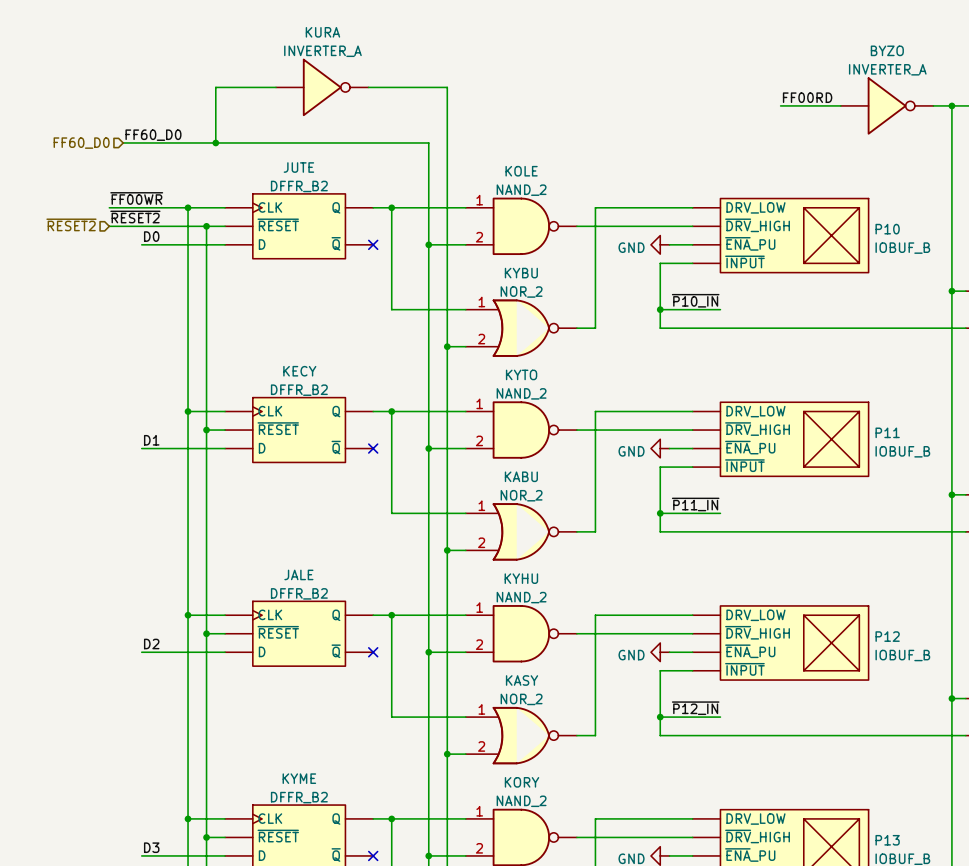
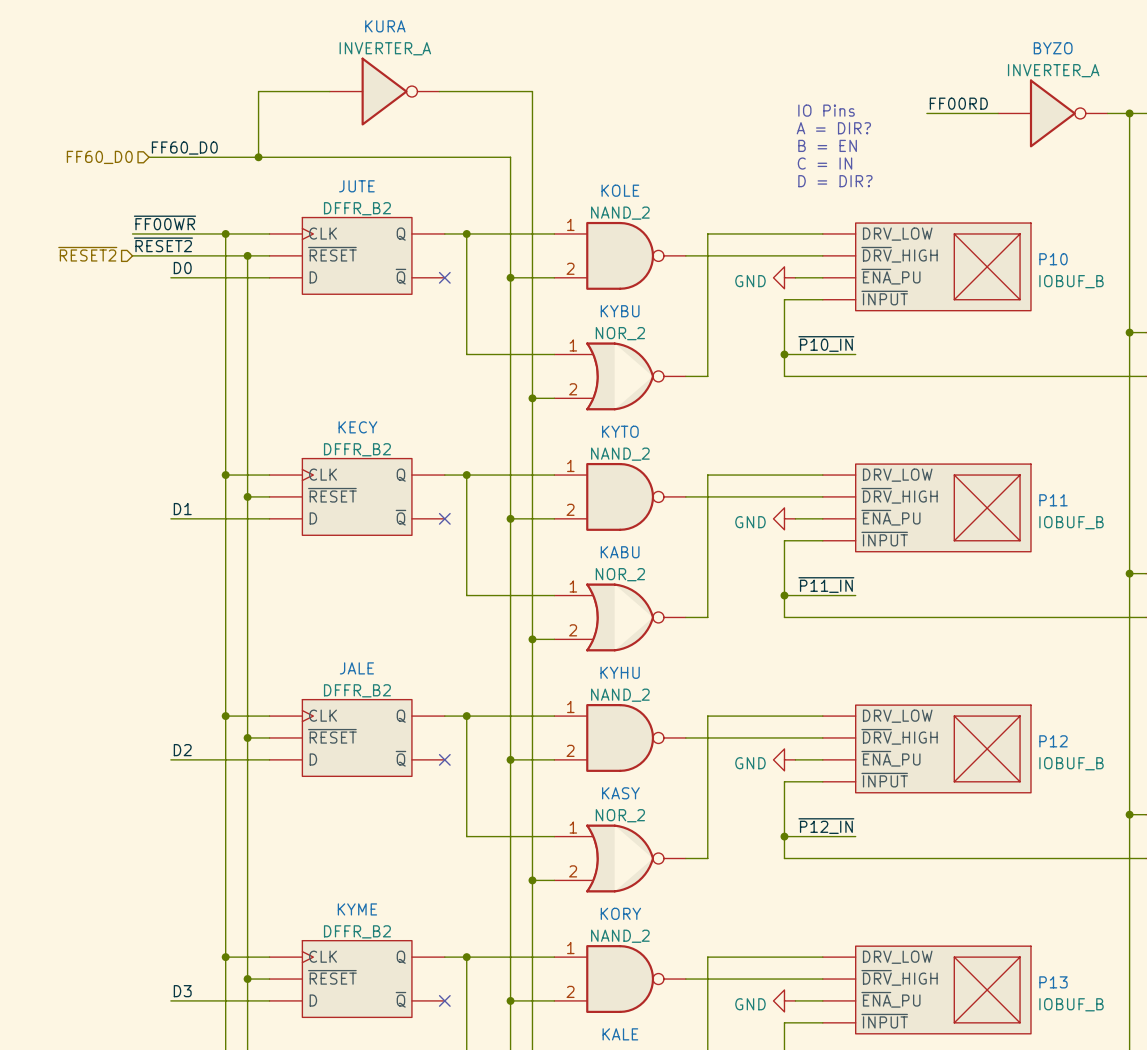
text: none -> IO Pins (826, 110)
text: none -> A = DIR? (833, 128)
text: none -> B = EN (827, 145)
text: none -> C = IN (824, 163)
text: none -> D = DIR? (835, 181)

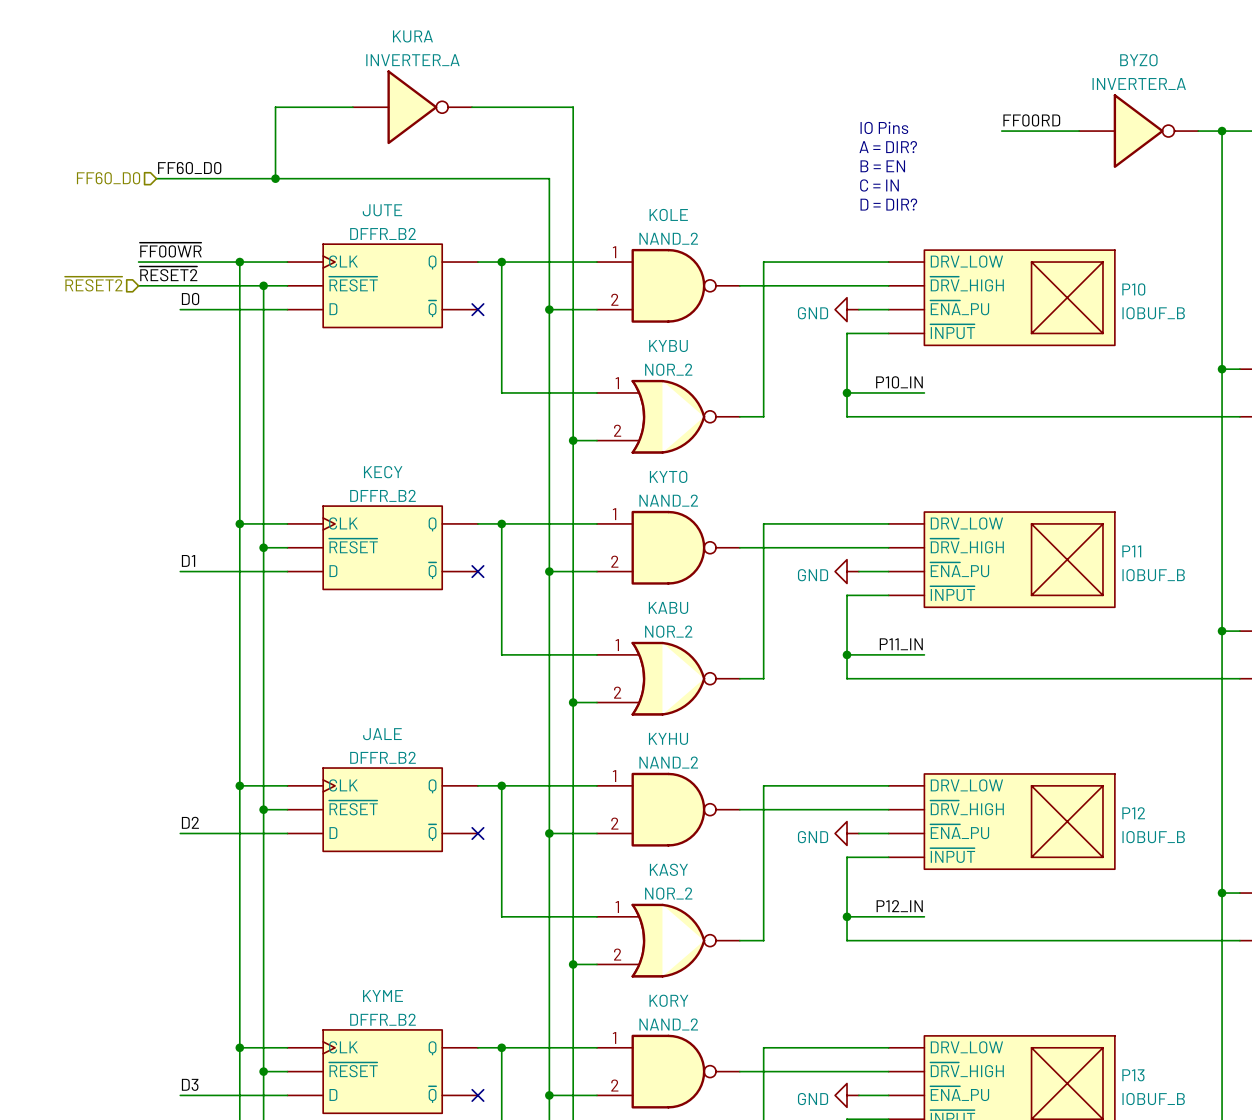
label: ~{P10_IN} (826, 343) -> P10_IN (899, 382)
label: ~{P11_IN} (826, 585) -> P11_IN (901, 644)
label: ~{P12_IN} (826, 826) -> P12_IN (899, 906)

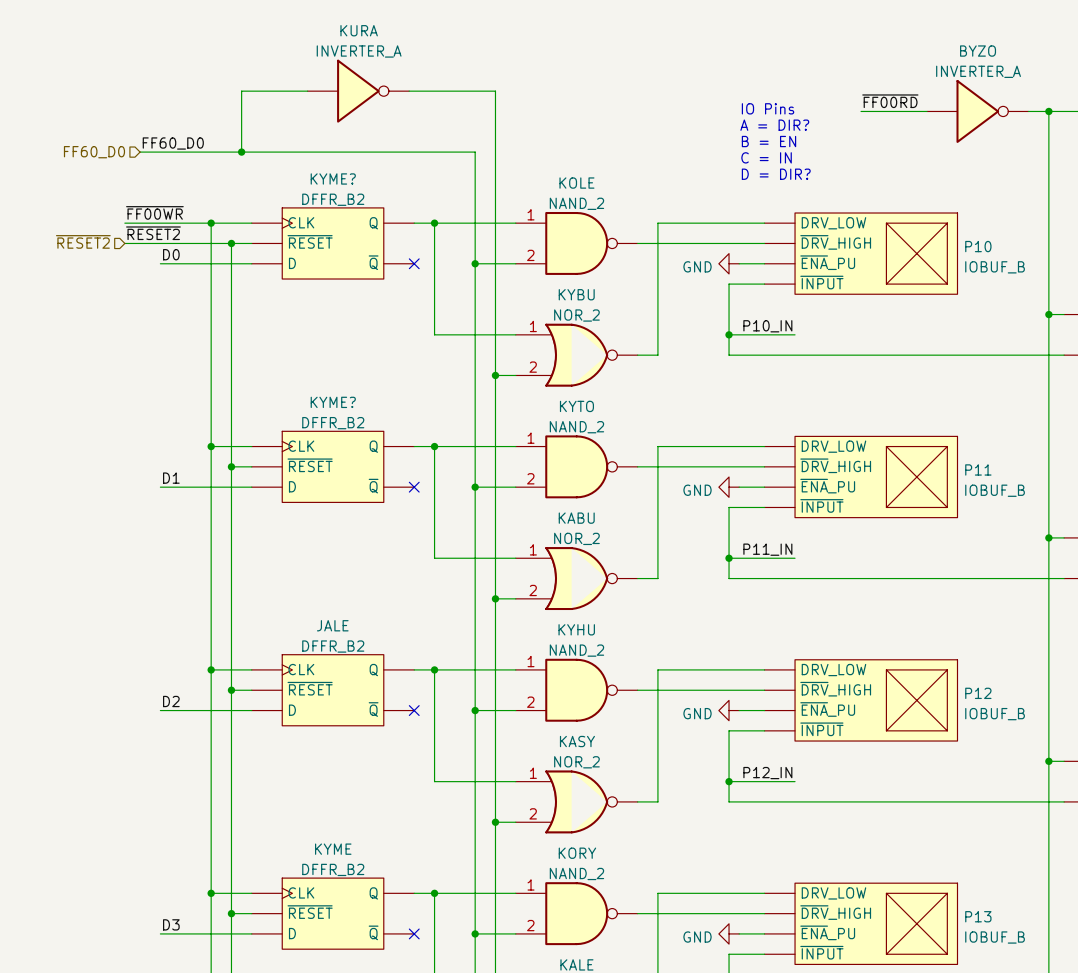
label: FF00RD (1031, 120) -> ~{FF00RD} (890, 101)
JUTE name: JUTE (382, 210) -> KYME? (333, 178)
KECY name: KECY (383, 472) -> KYME? (333, 402)

